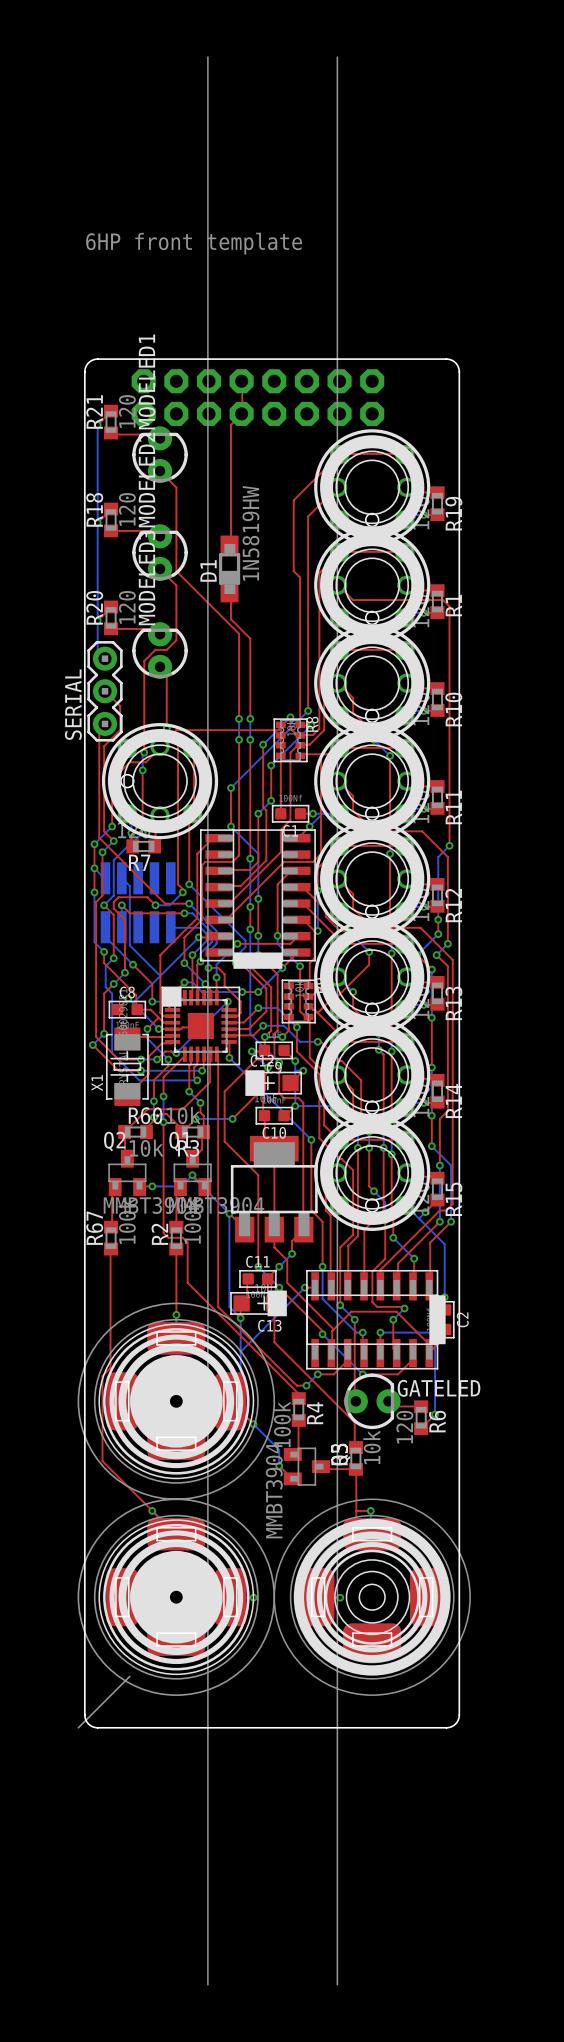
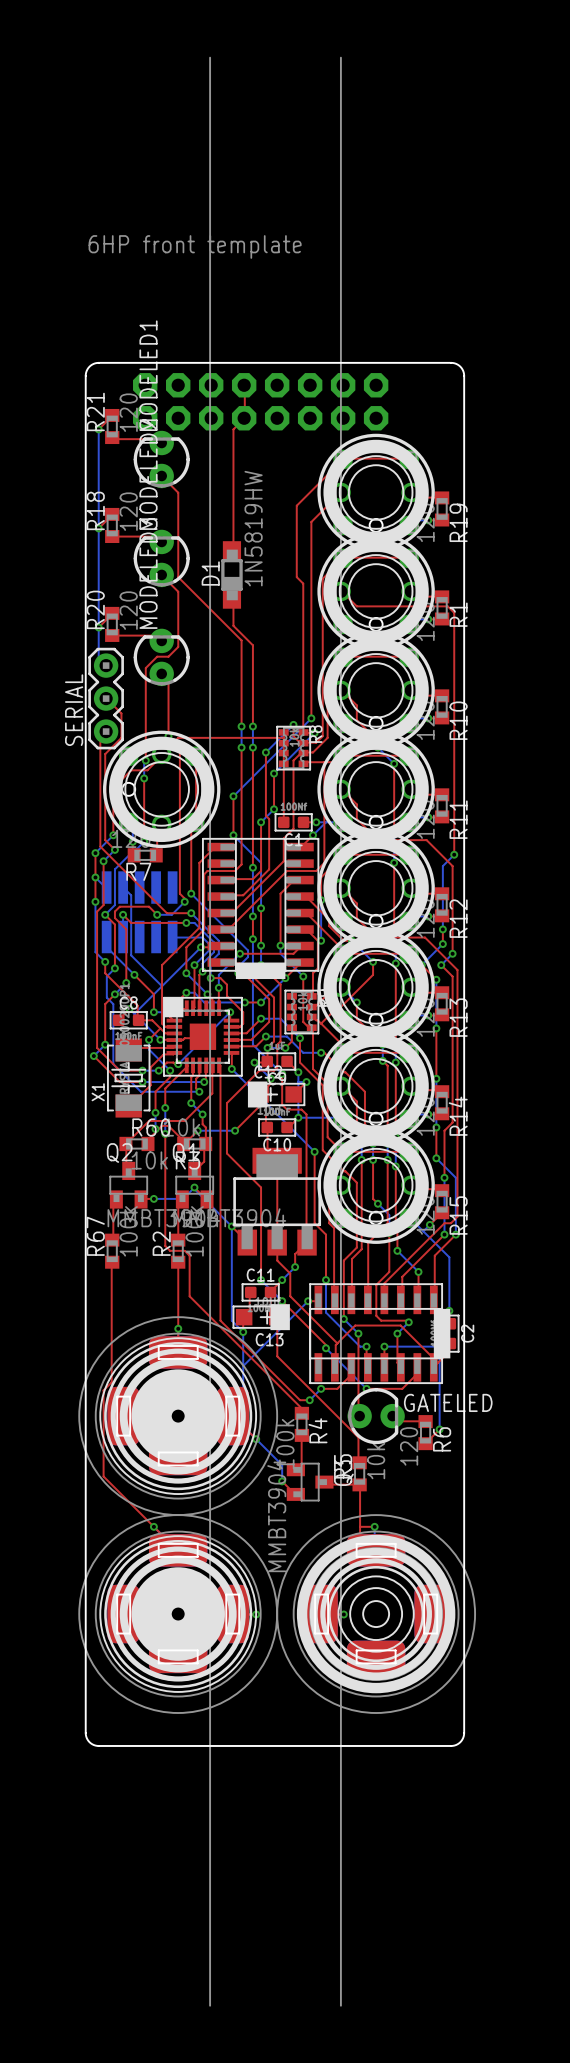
drawing shape: [77, 57, 461, 1985] -> [84, 57, 466, 2006]

